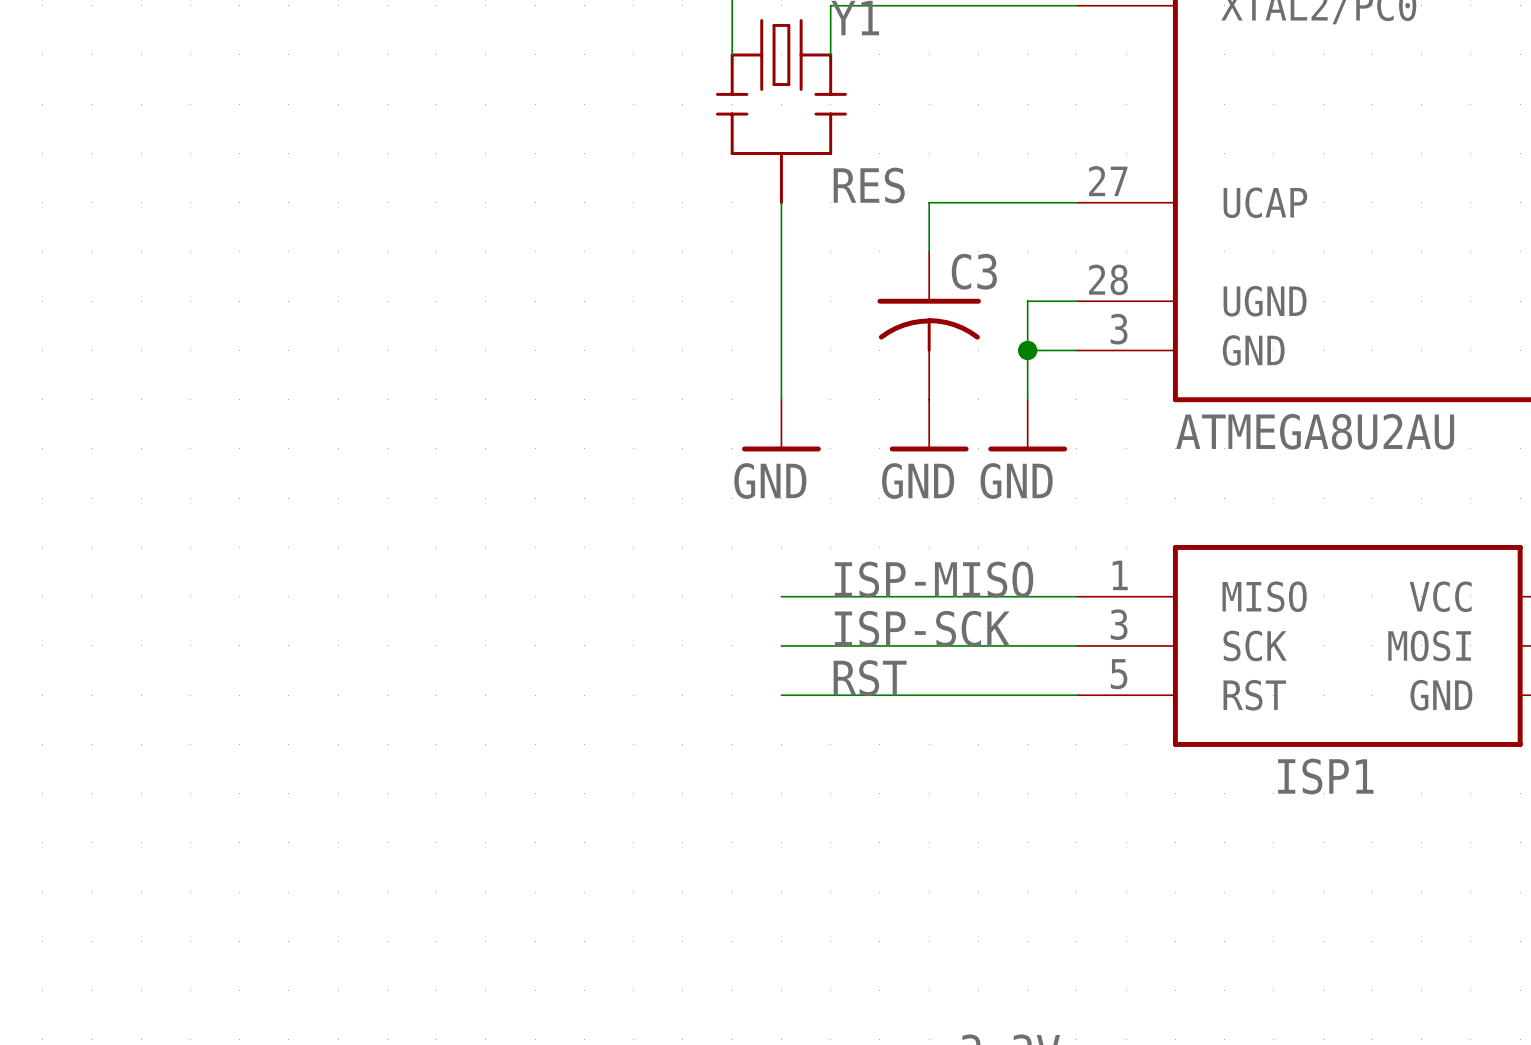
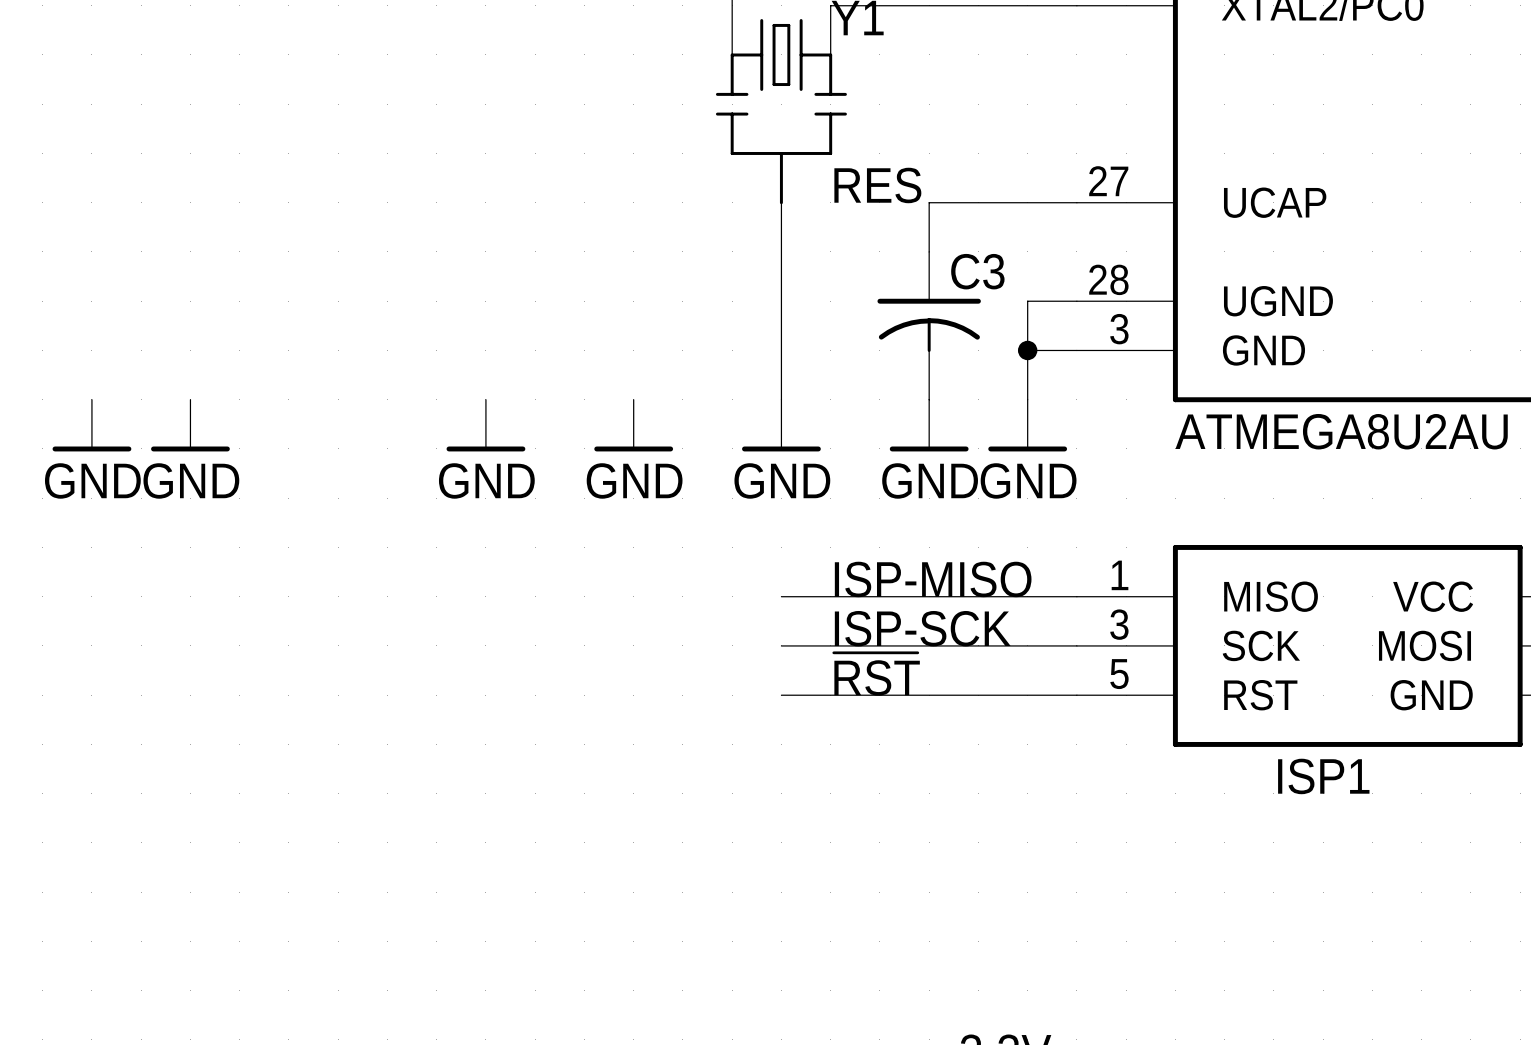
power symbol: none -> GND (91, 425)
power symbol: none -> GND (190, 425)
power symbol: none -> GND (485, 425)
power symbol: none -> GND (633, 425)
label: RST (870, 678) -> ~{RST} (876, 674)

